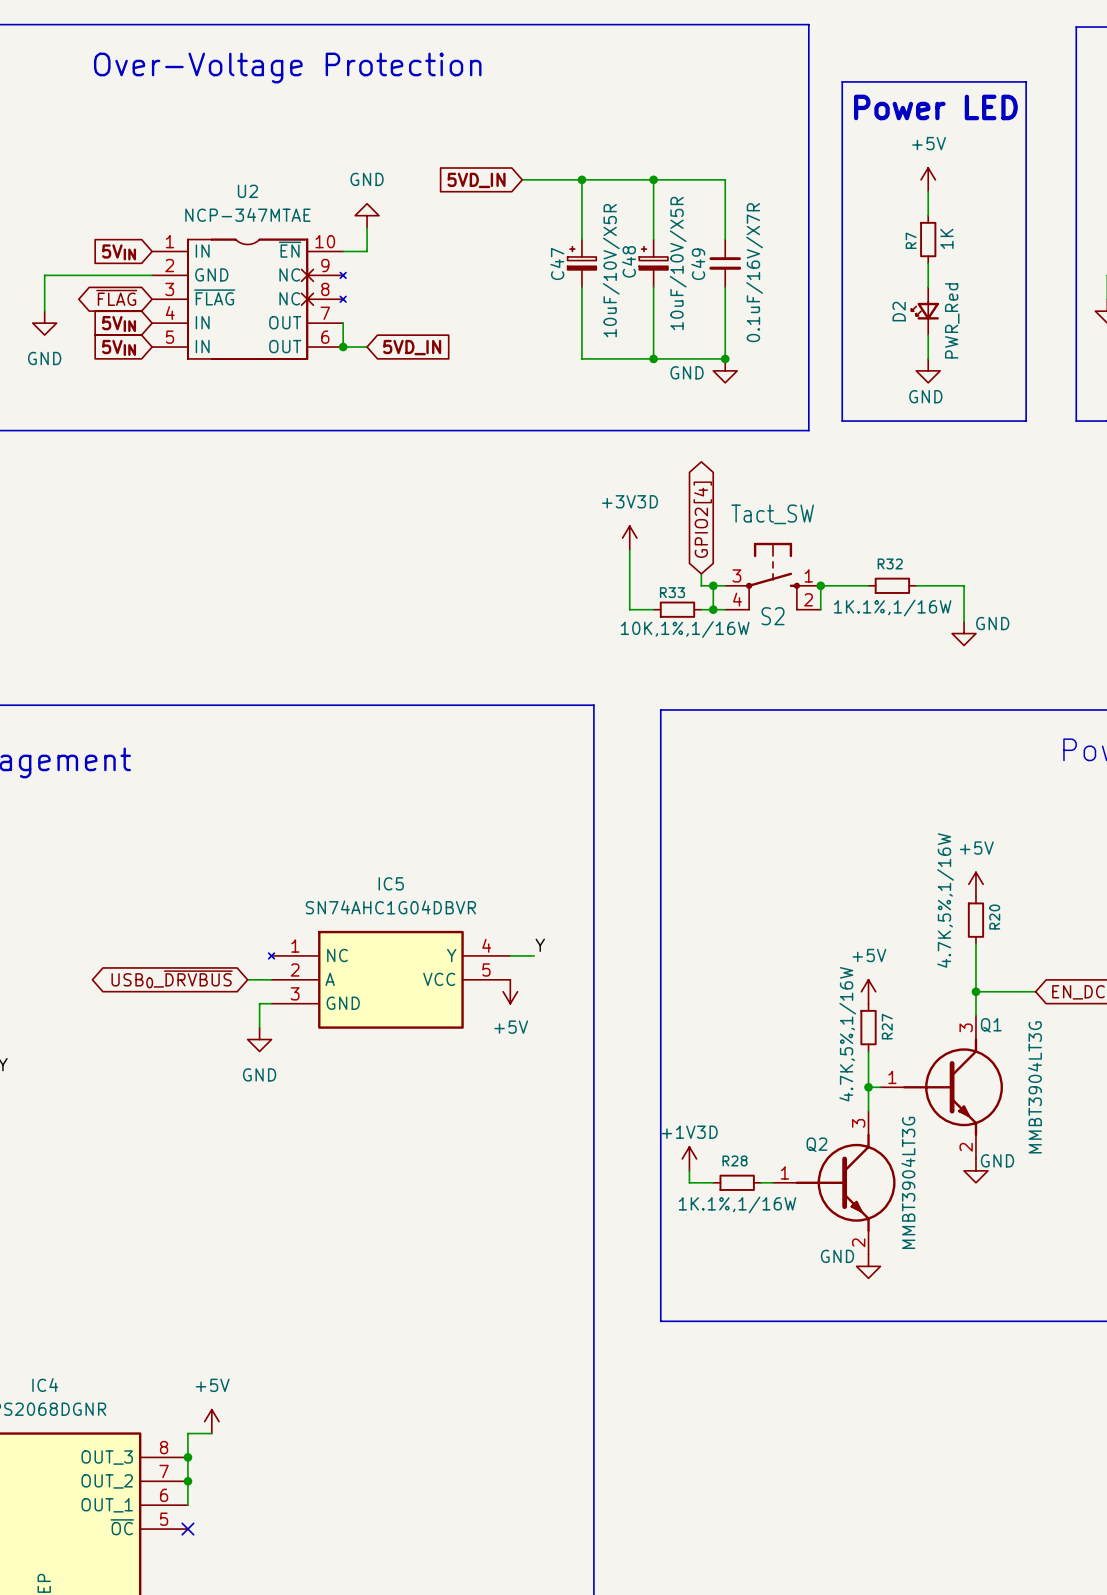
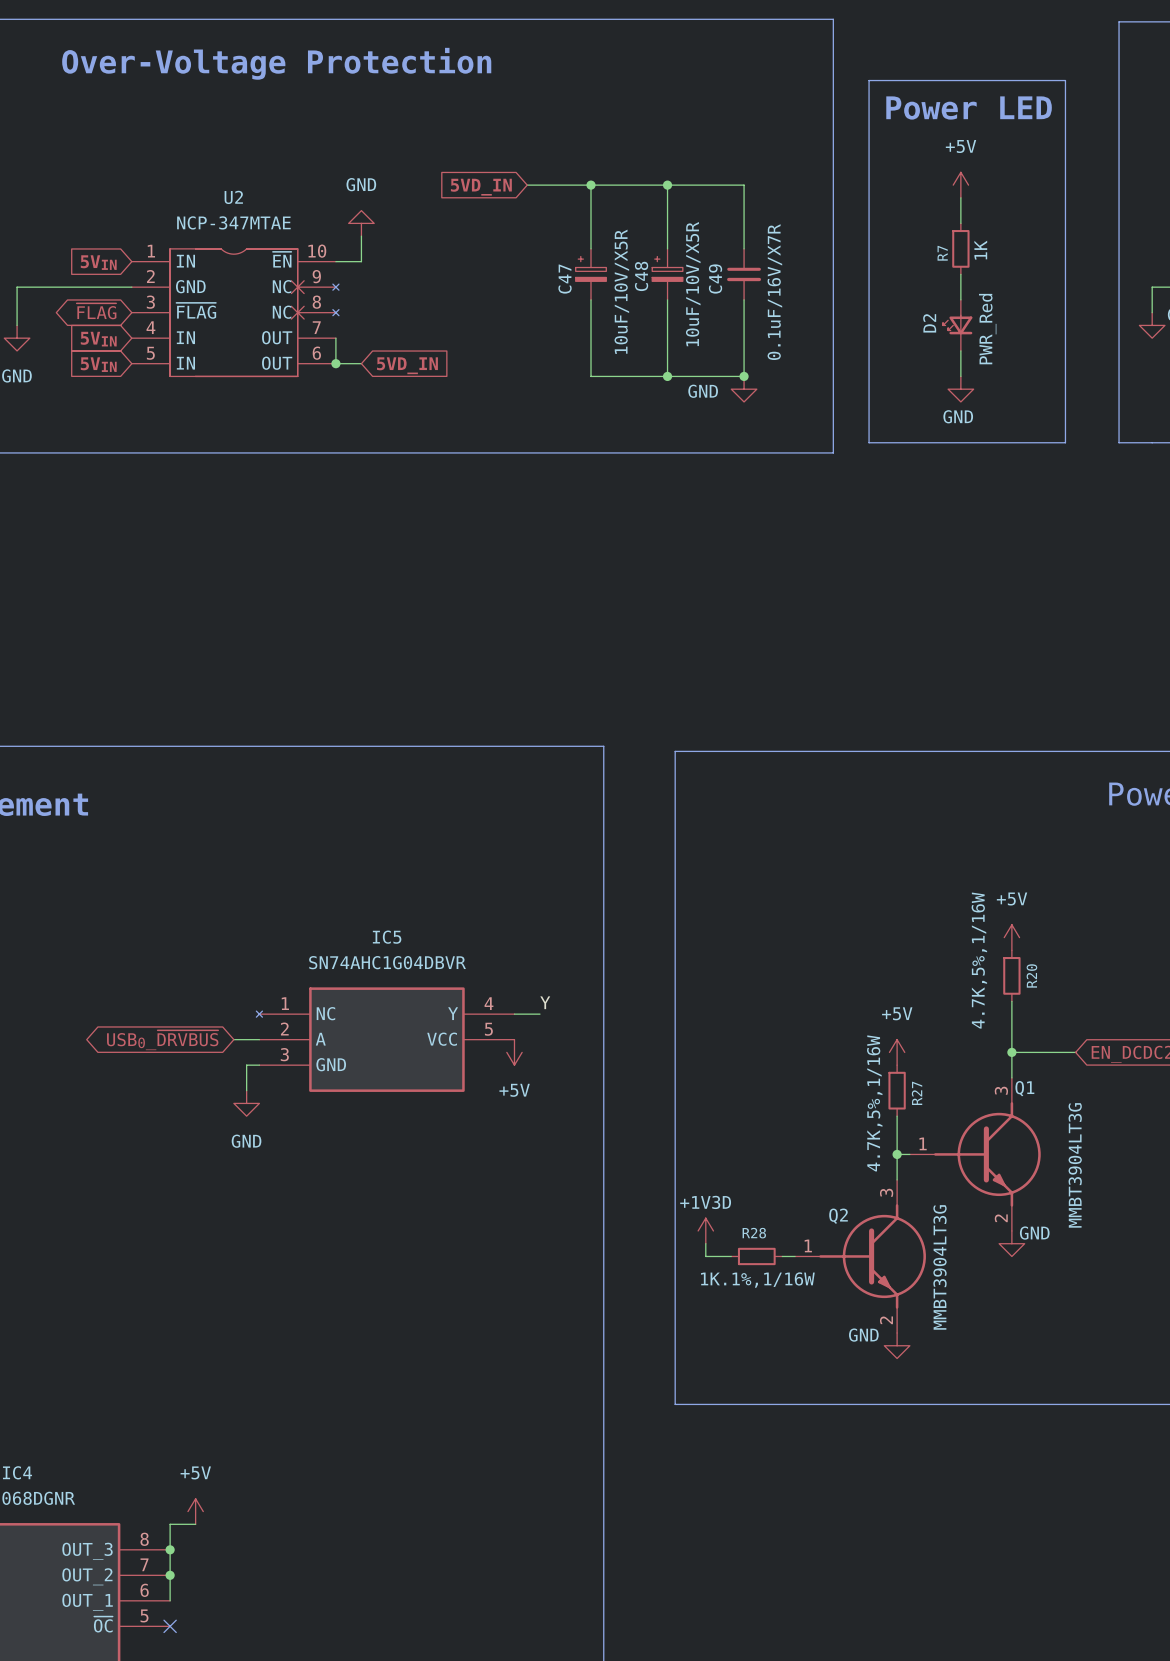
global label: GPIO2[4] (702, 519) -> none
power symbol: +3V3D (629, 538) -> none
wire: (629, 549) (629, 609) (653, 609) -> none
wire: (701, 573) (701, 585) (725, 585) -> none
S2: Tact_SW (773, 576) -> none
wire: (713, 585) (713, 609) -> none
junction: (713, 585) -> none
junction: (820, 585) -> none
wire: (868, 585) (820, 585) (820, 609) -> none
R32: 1K.1%,1/16W (892, 585) -> none
wire: (916, 585) (964, 585) (964, 621) -> none
R33: 10K,1%,1/16W (677, 609) -> none
wire: (701, 609) (725, 609) -> none
junction: (713, 609) -> none
power symbol: GND (964, 633) -> none

